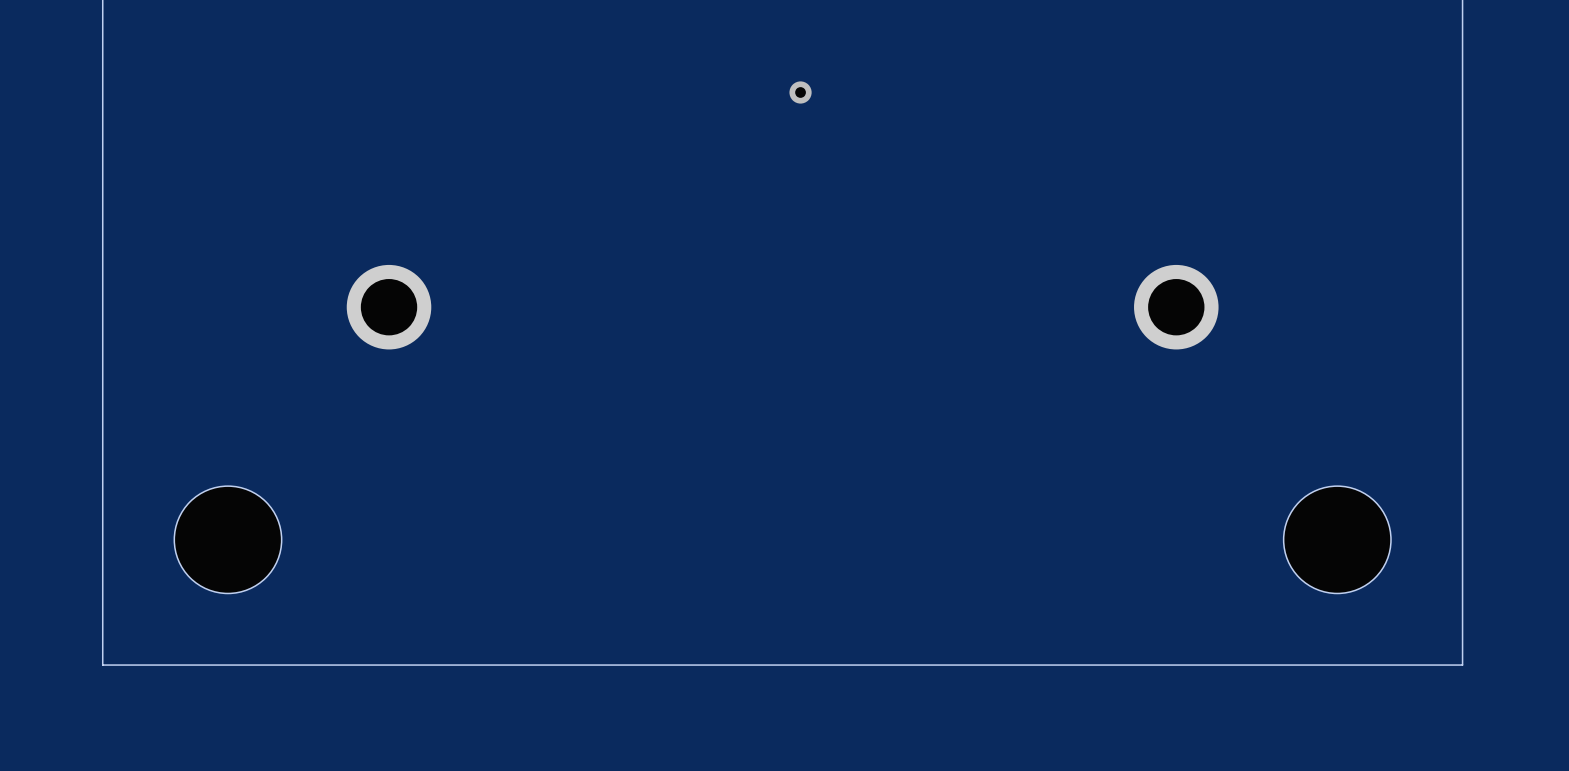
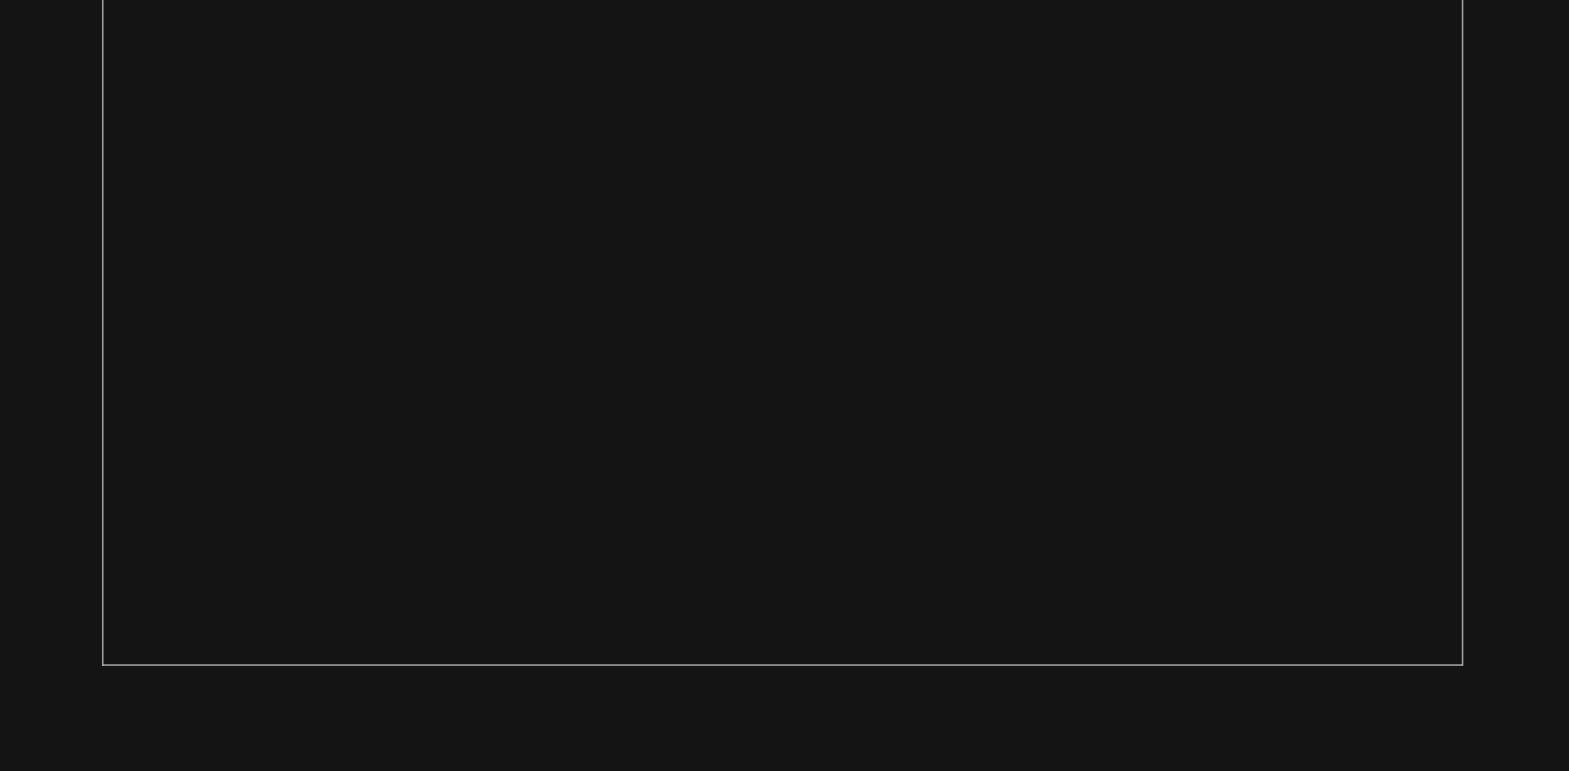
via: (800, 92) -> none
part: (389, 307) -> none
part: (1176, 307) -> none
hole: (227, 539) -> none
hole: (1337, 539) -> none

